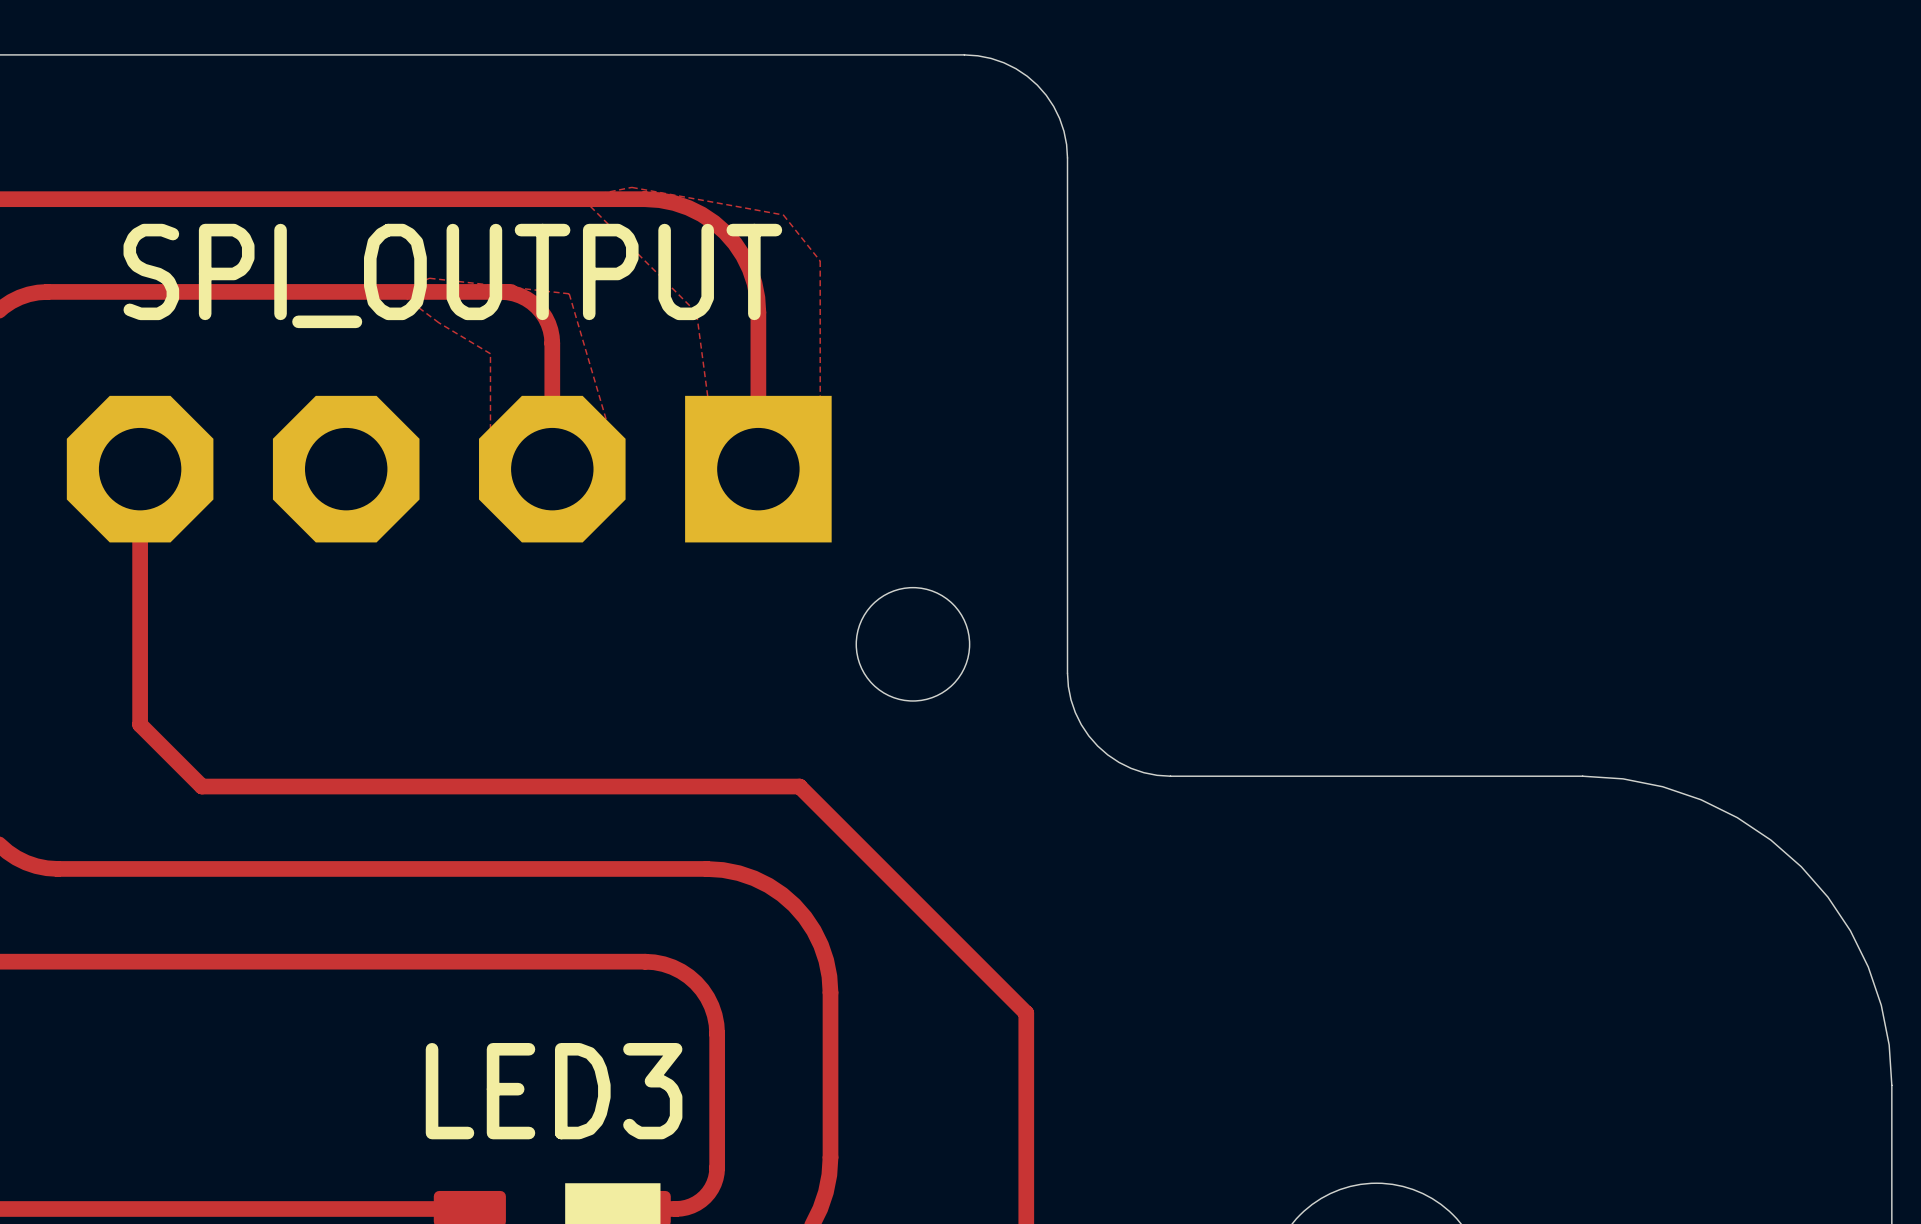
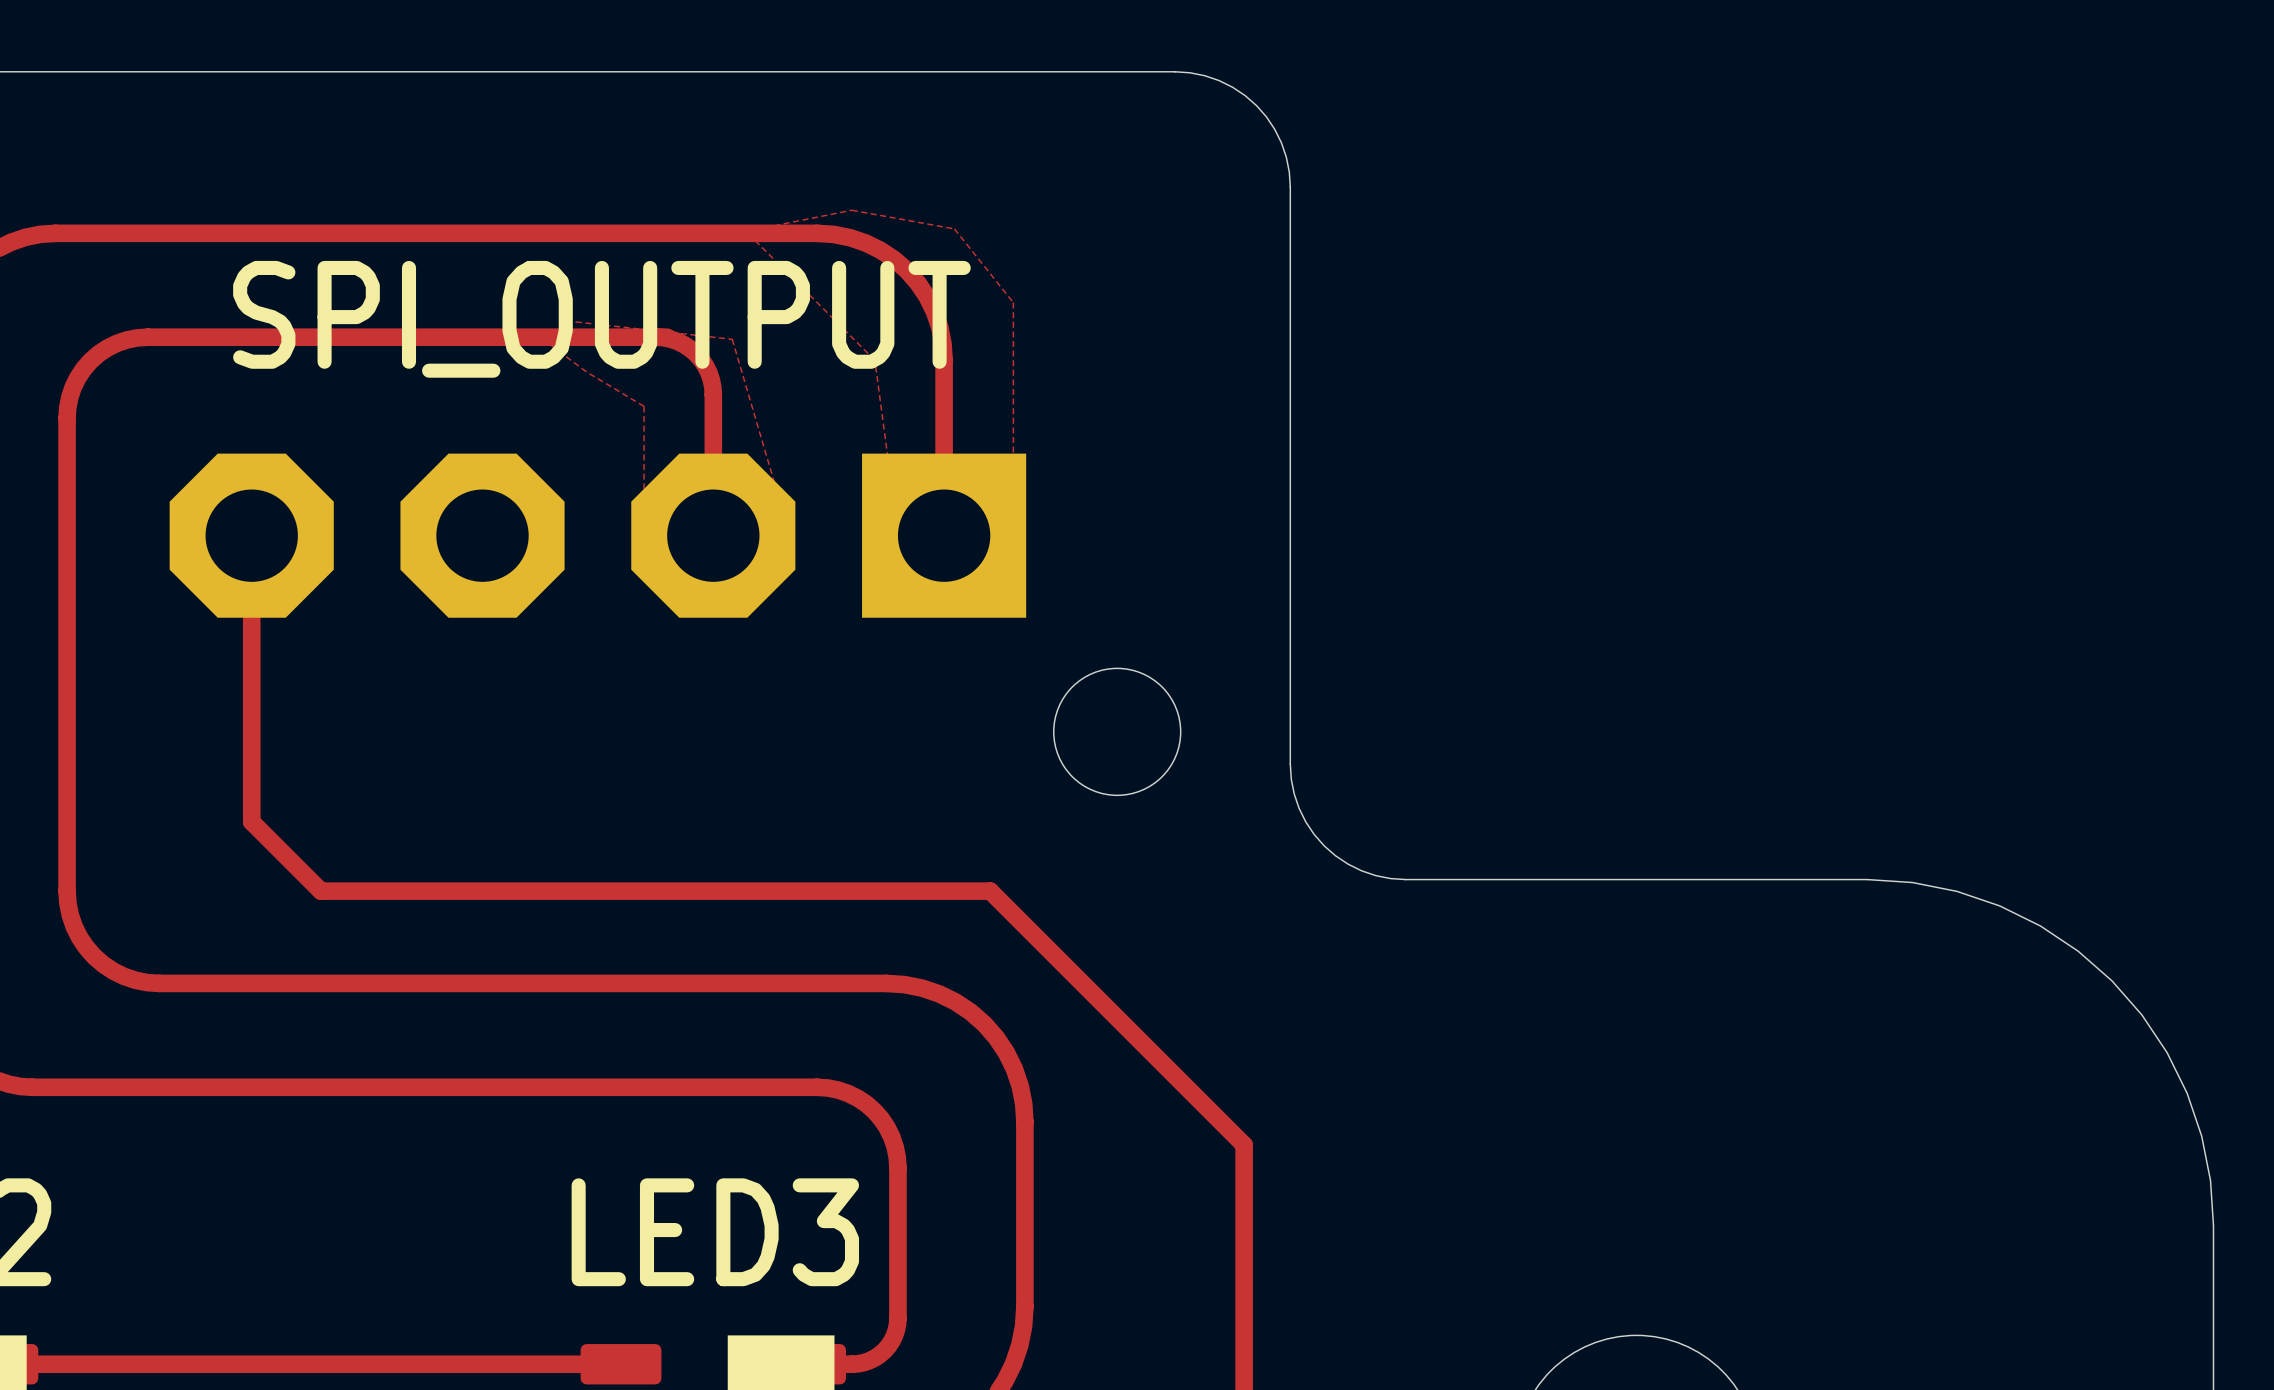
zone outline: (631, 187) (783, 214) -> (802, 220) (851, 210) (954, 228) (972, 251)

